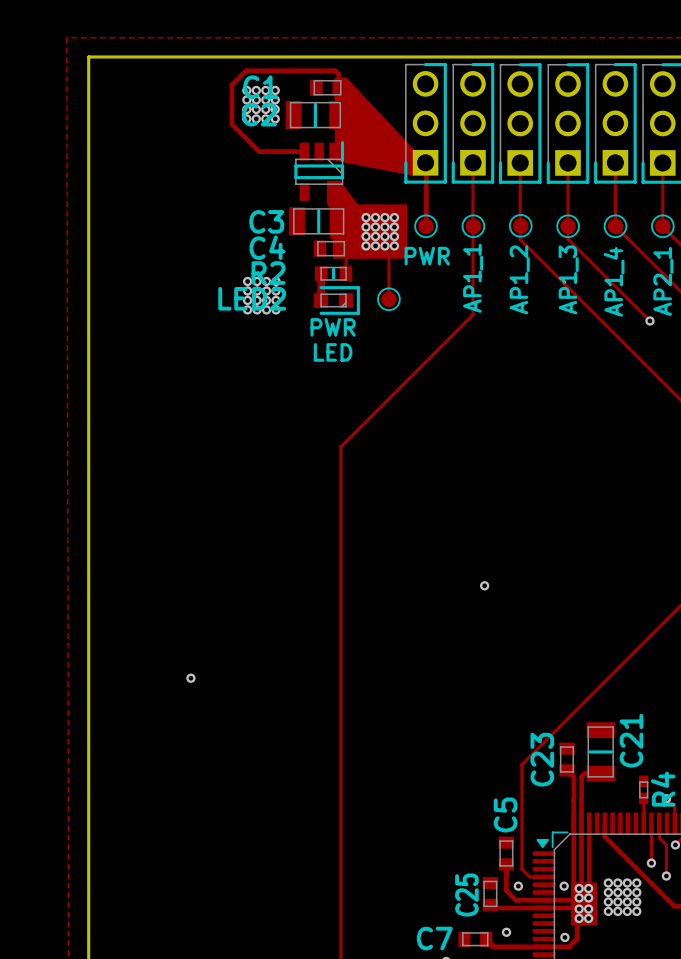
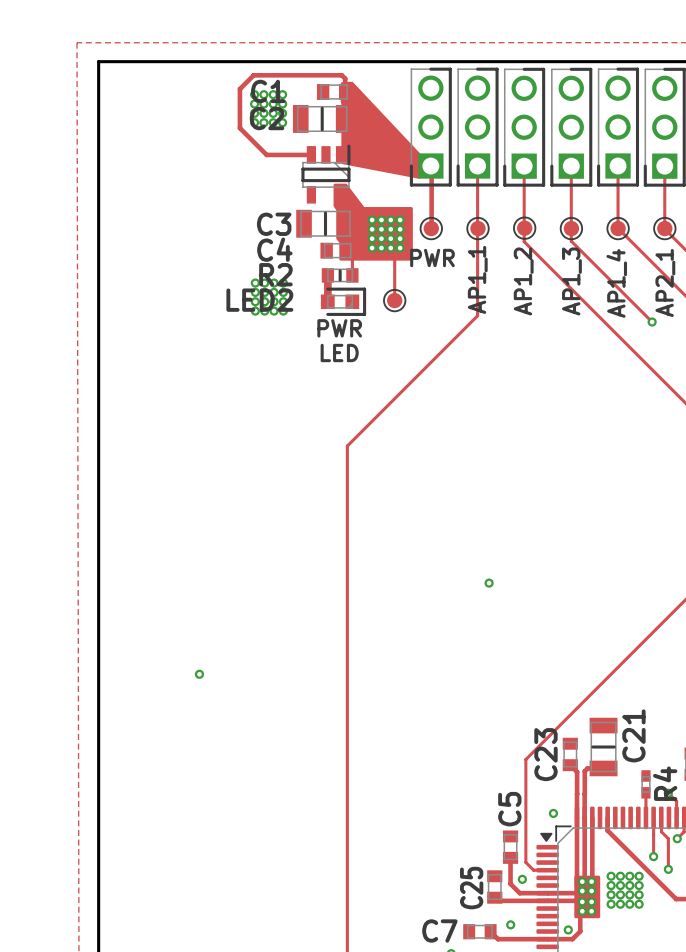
via position: (564, 886) -> (553, 813)

